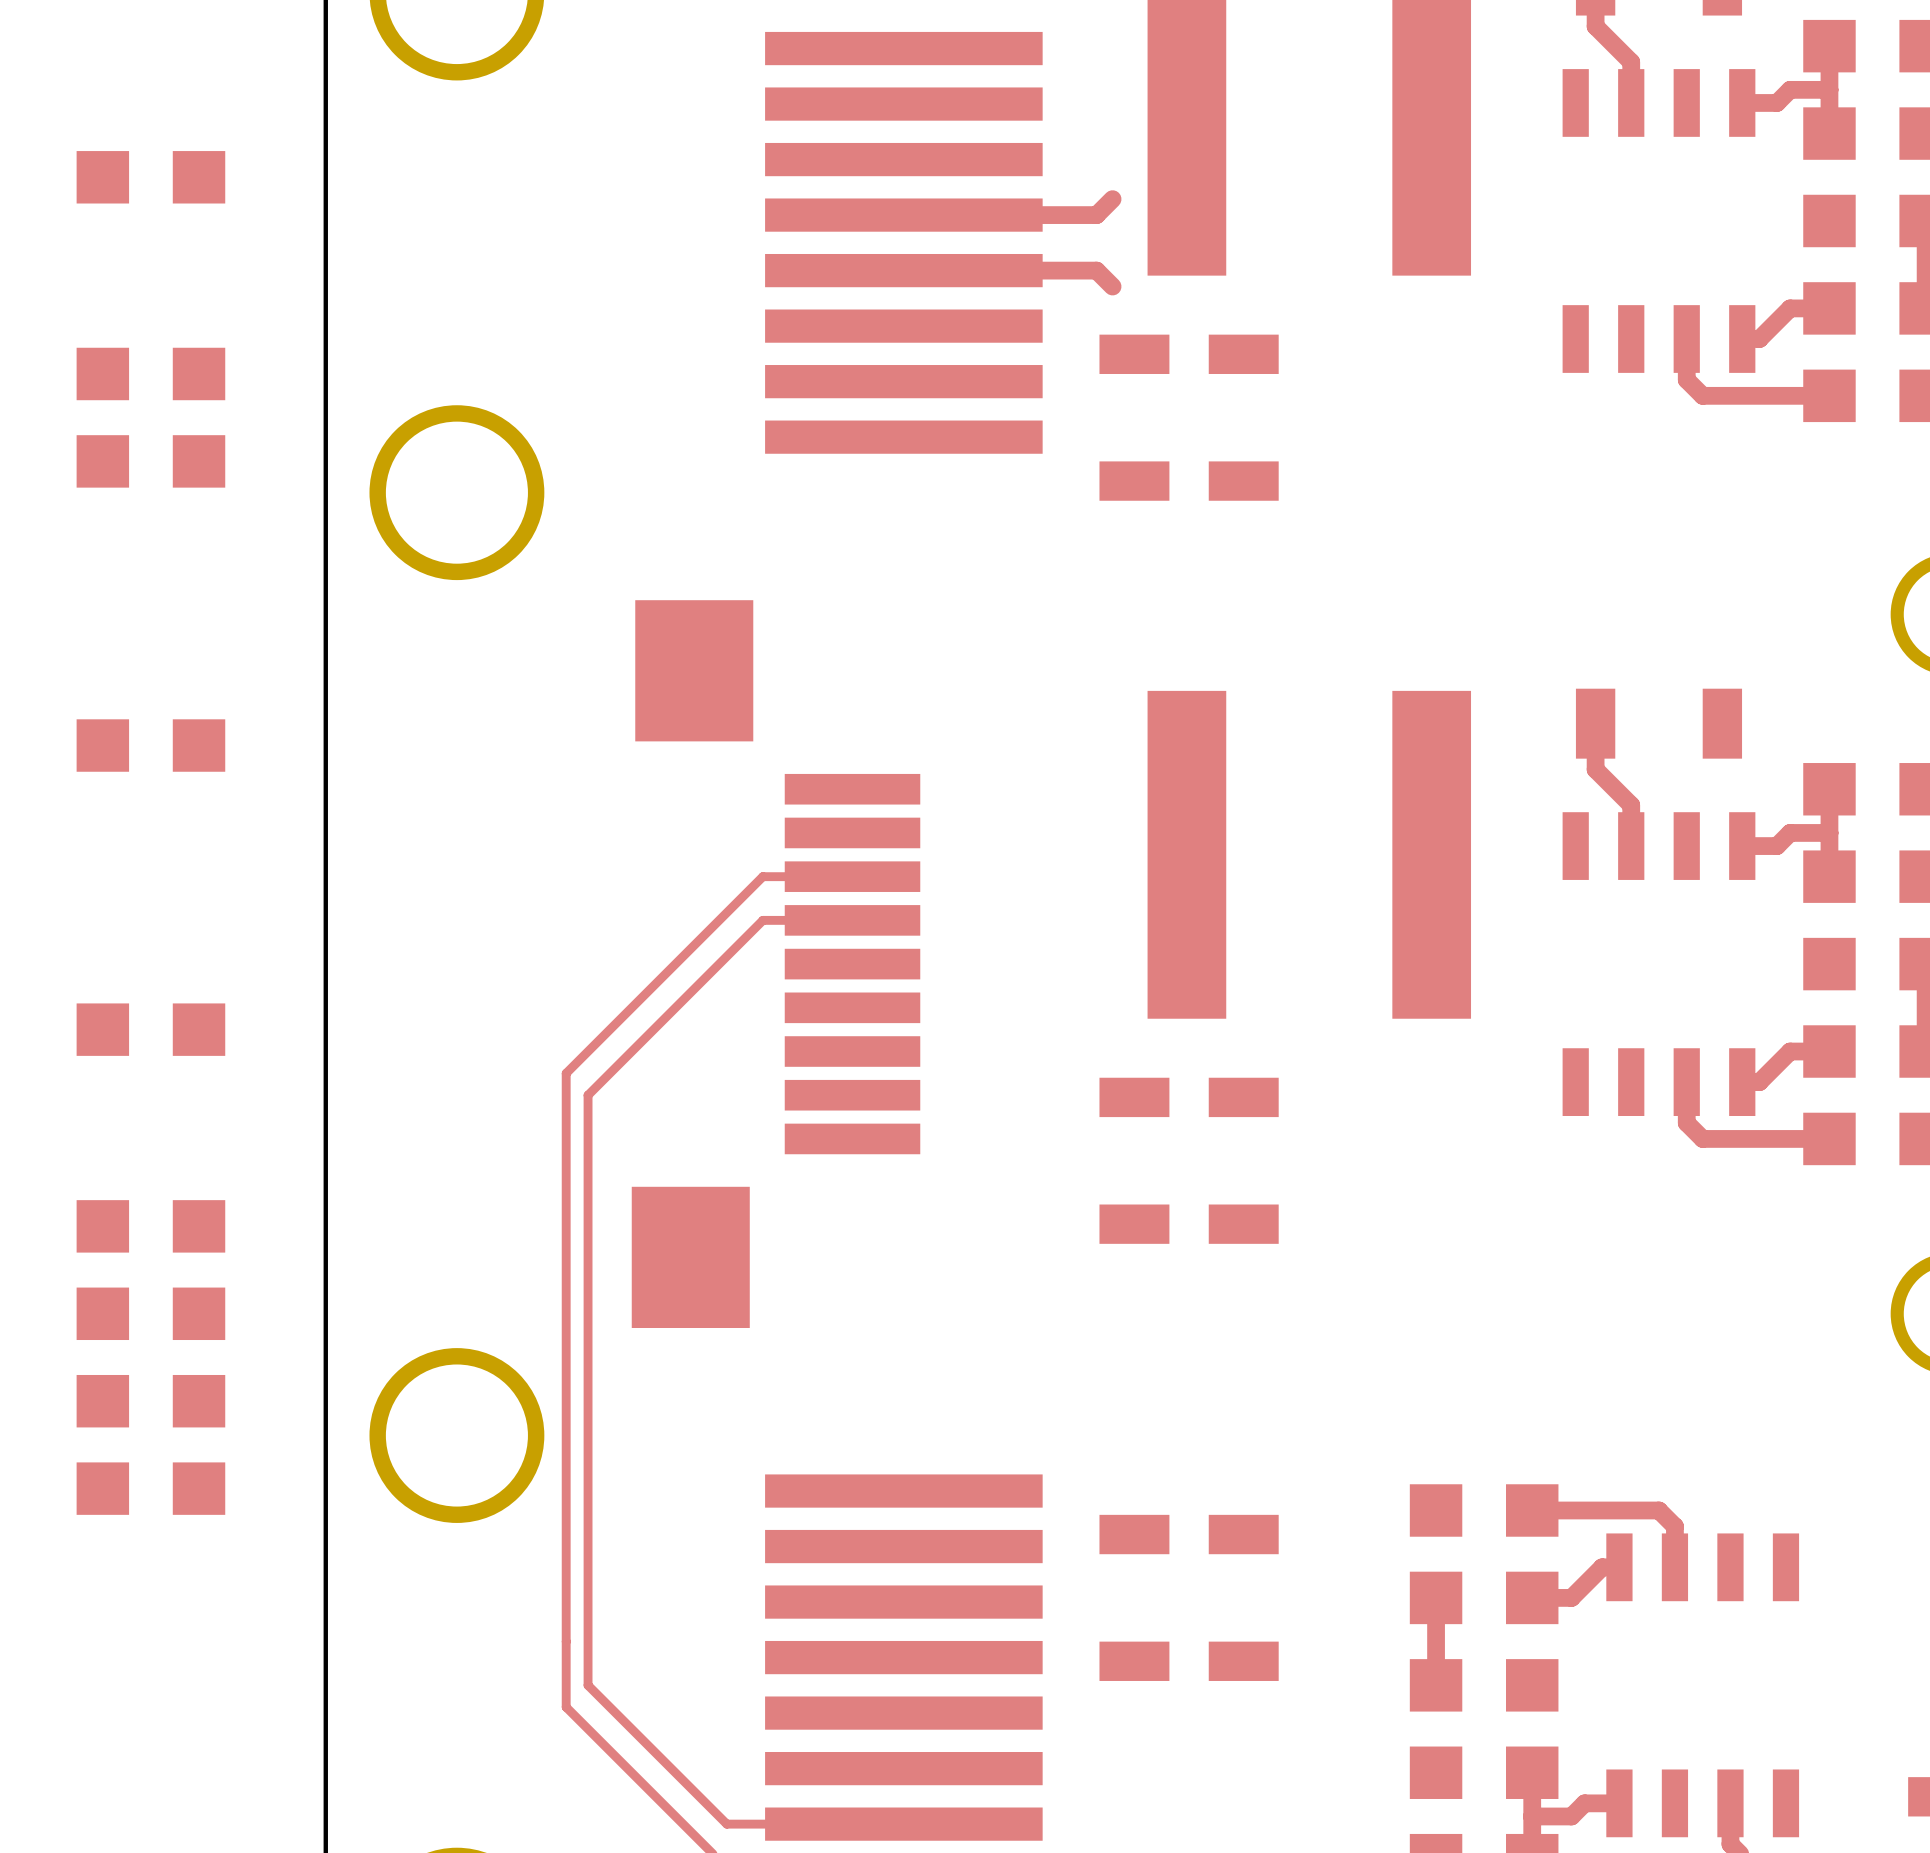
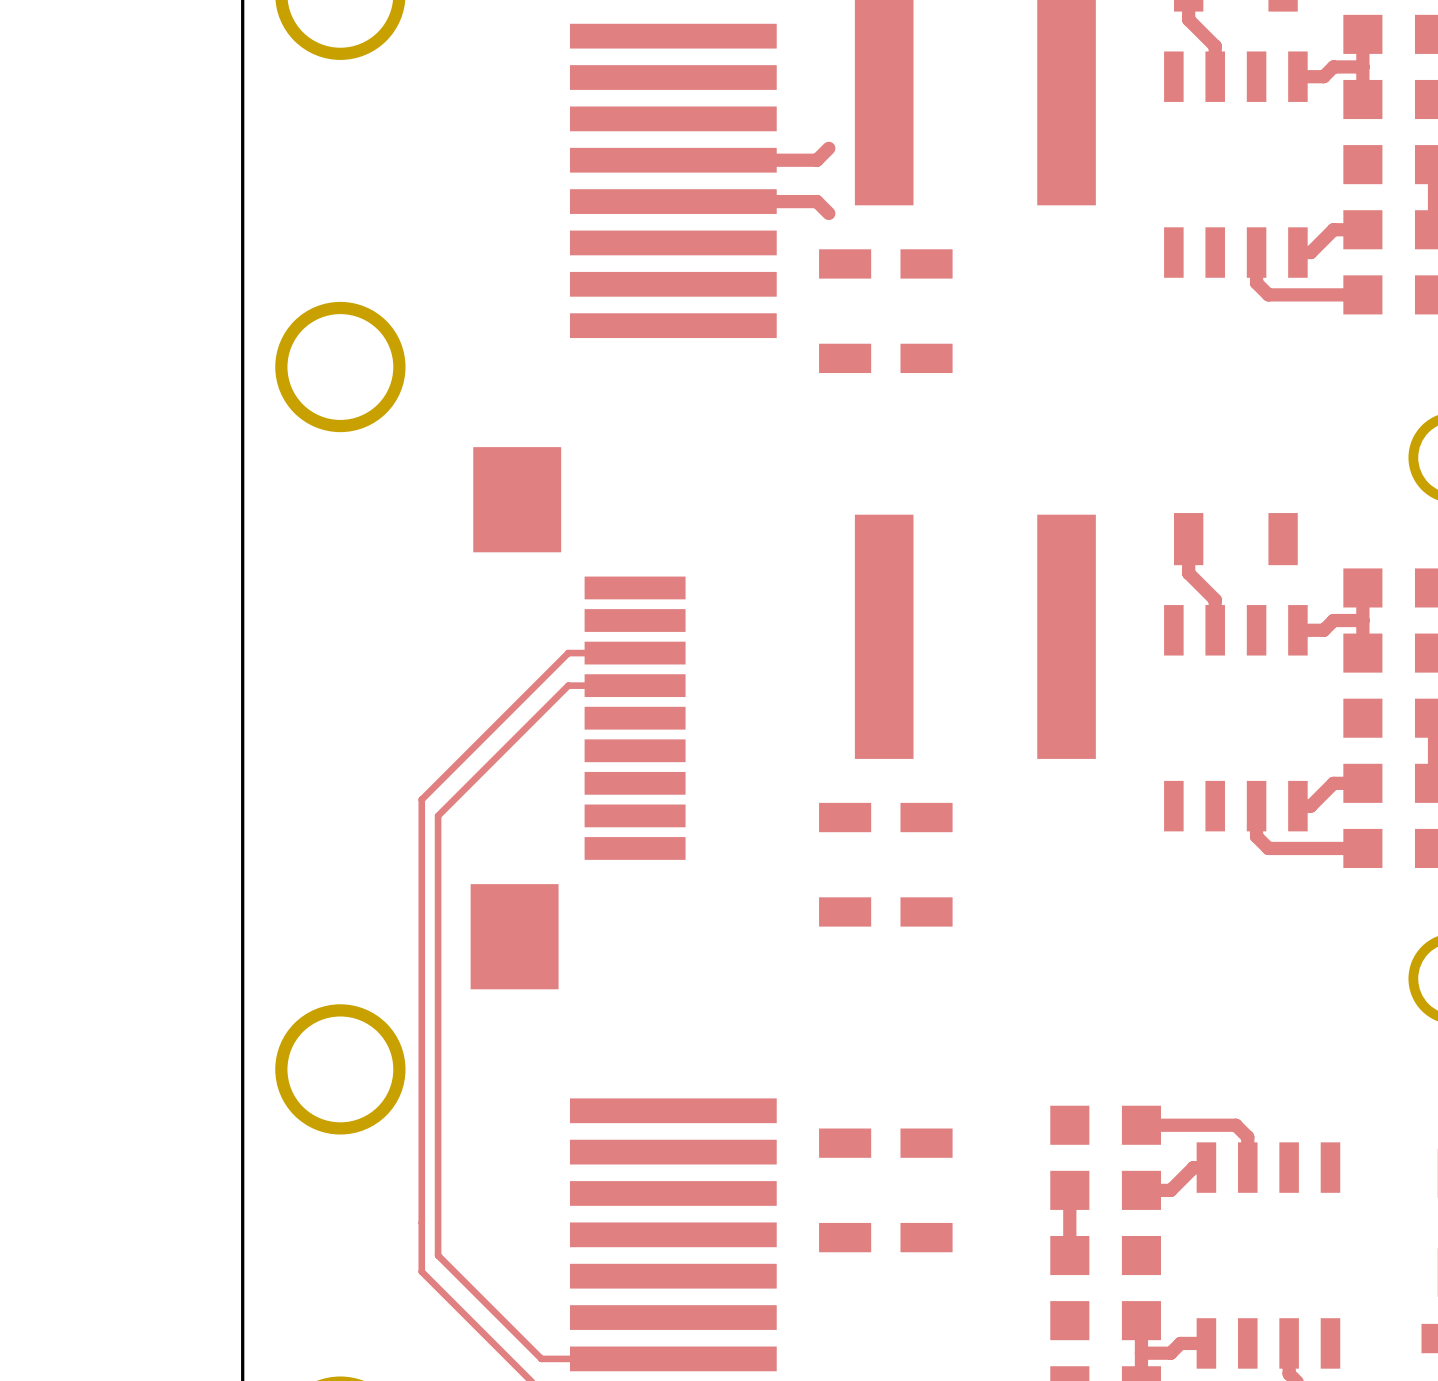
part: (150, 177) -> none
part: (150, 373) -> none
part: (150, 461) -> none
part: (150, 745) -> none
part: (150, 1029) -> none
part: (150, 1226) -> none
part: (150, 1313) -> none
part: (150, 1401) -> none
part: (150, 1488) -> none

